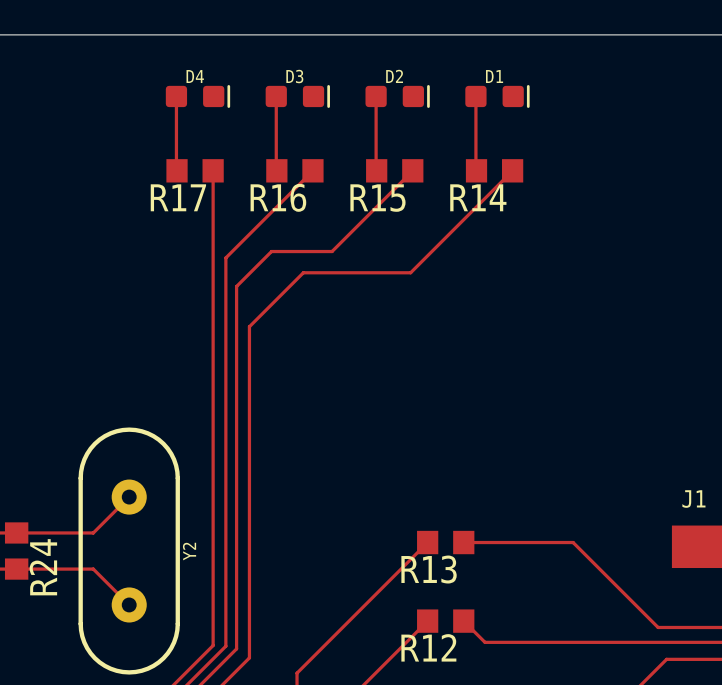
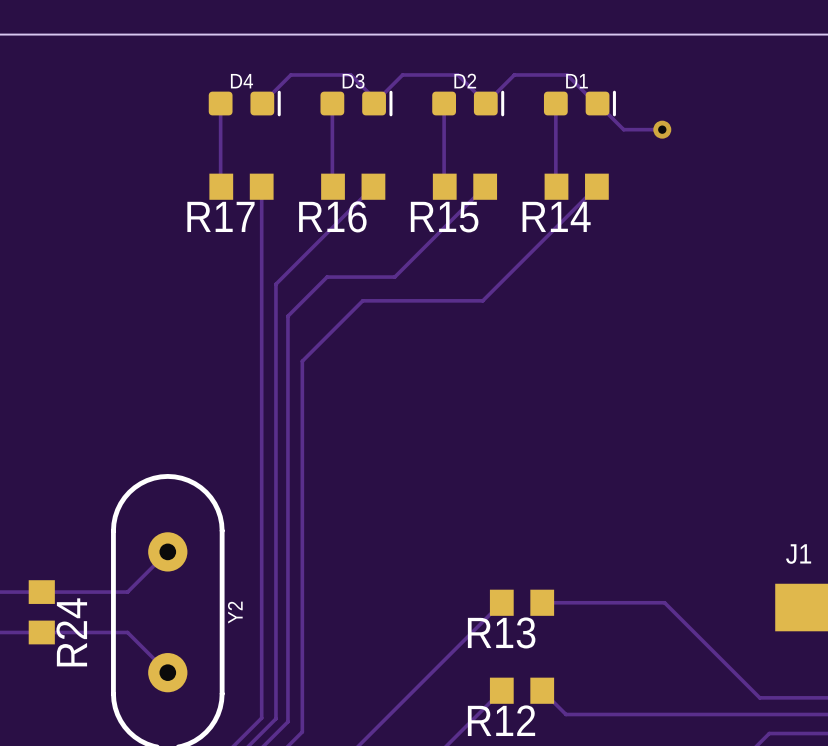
track: none -> (262, 103) (290, 74) (350, 74) (374, 98) (374, 103) (402, 74) (457, 74) (485, 103) (514, 74) (567, 74) (623, 129) (662, 129)
via: none -> (662, 129)

